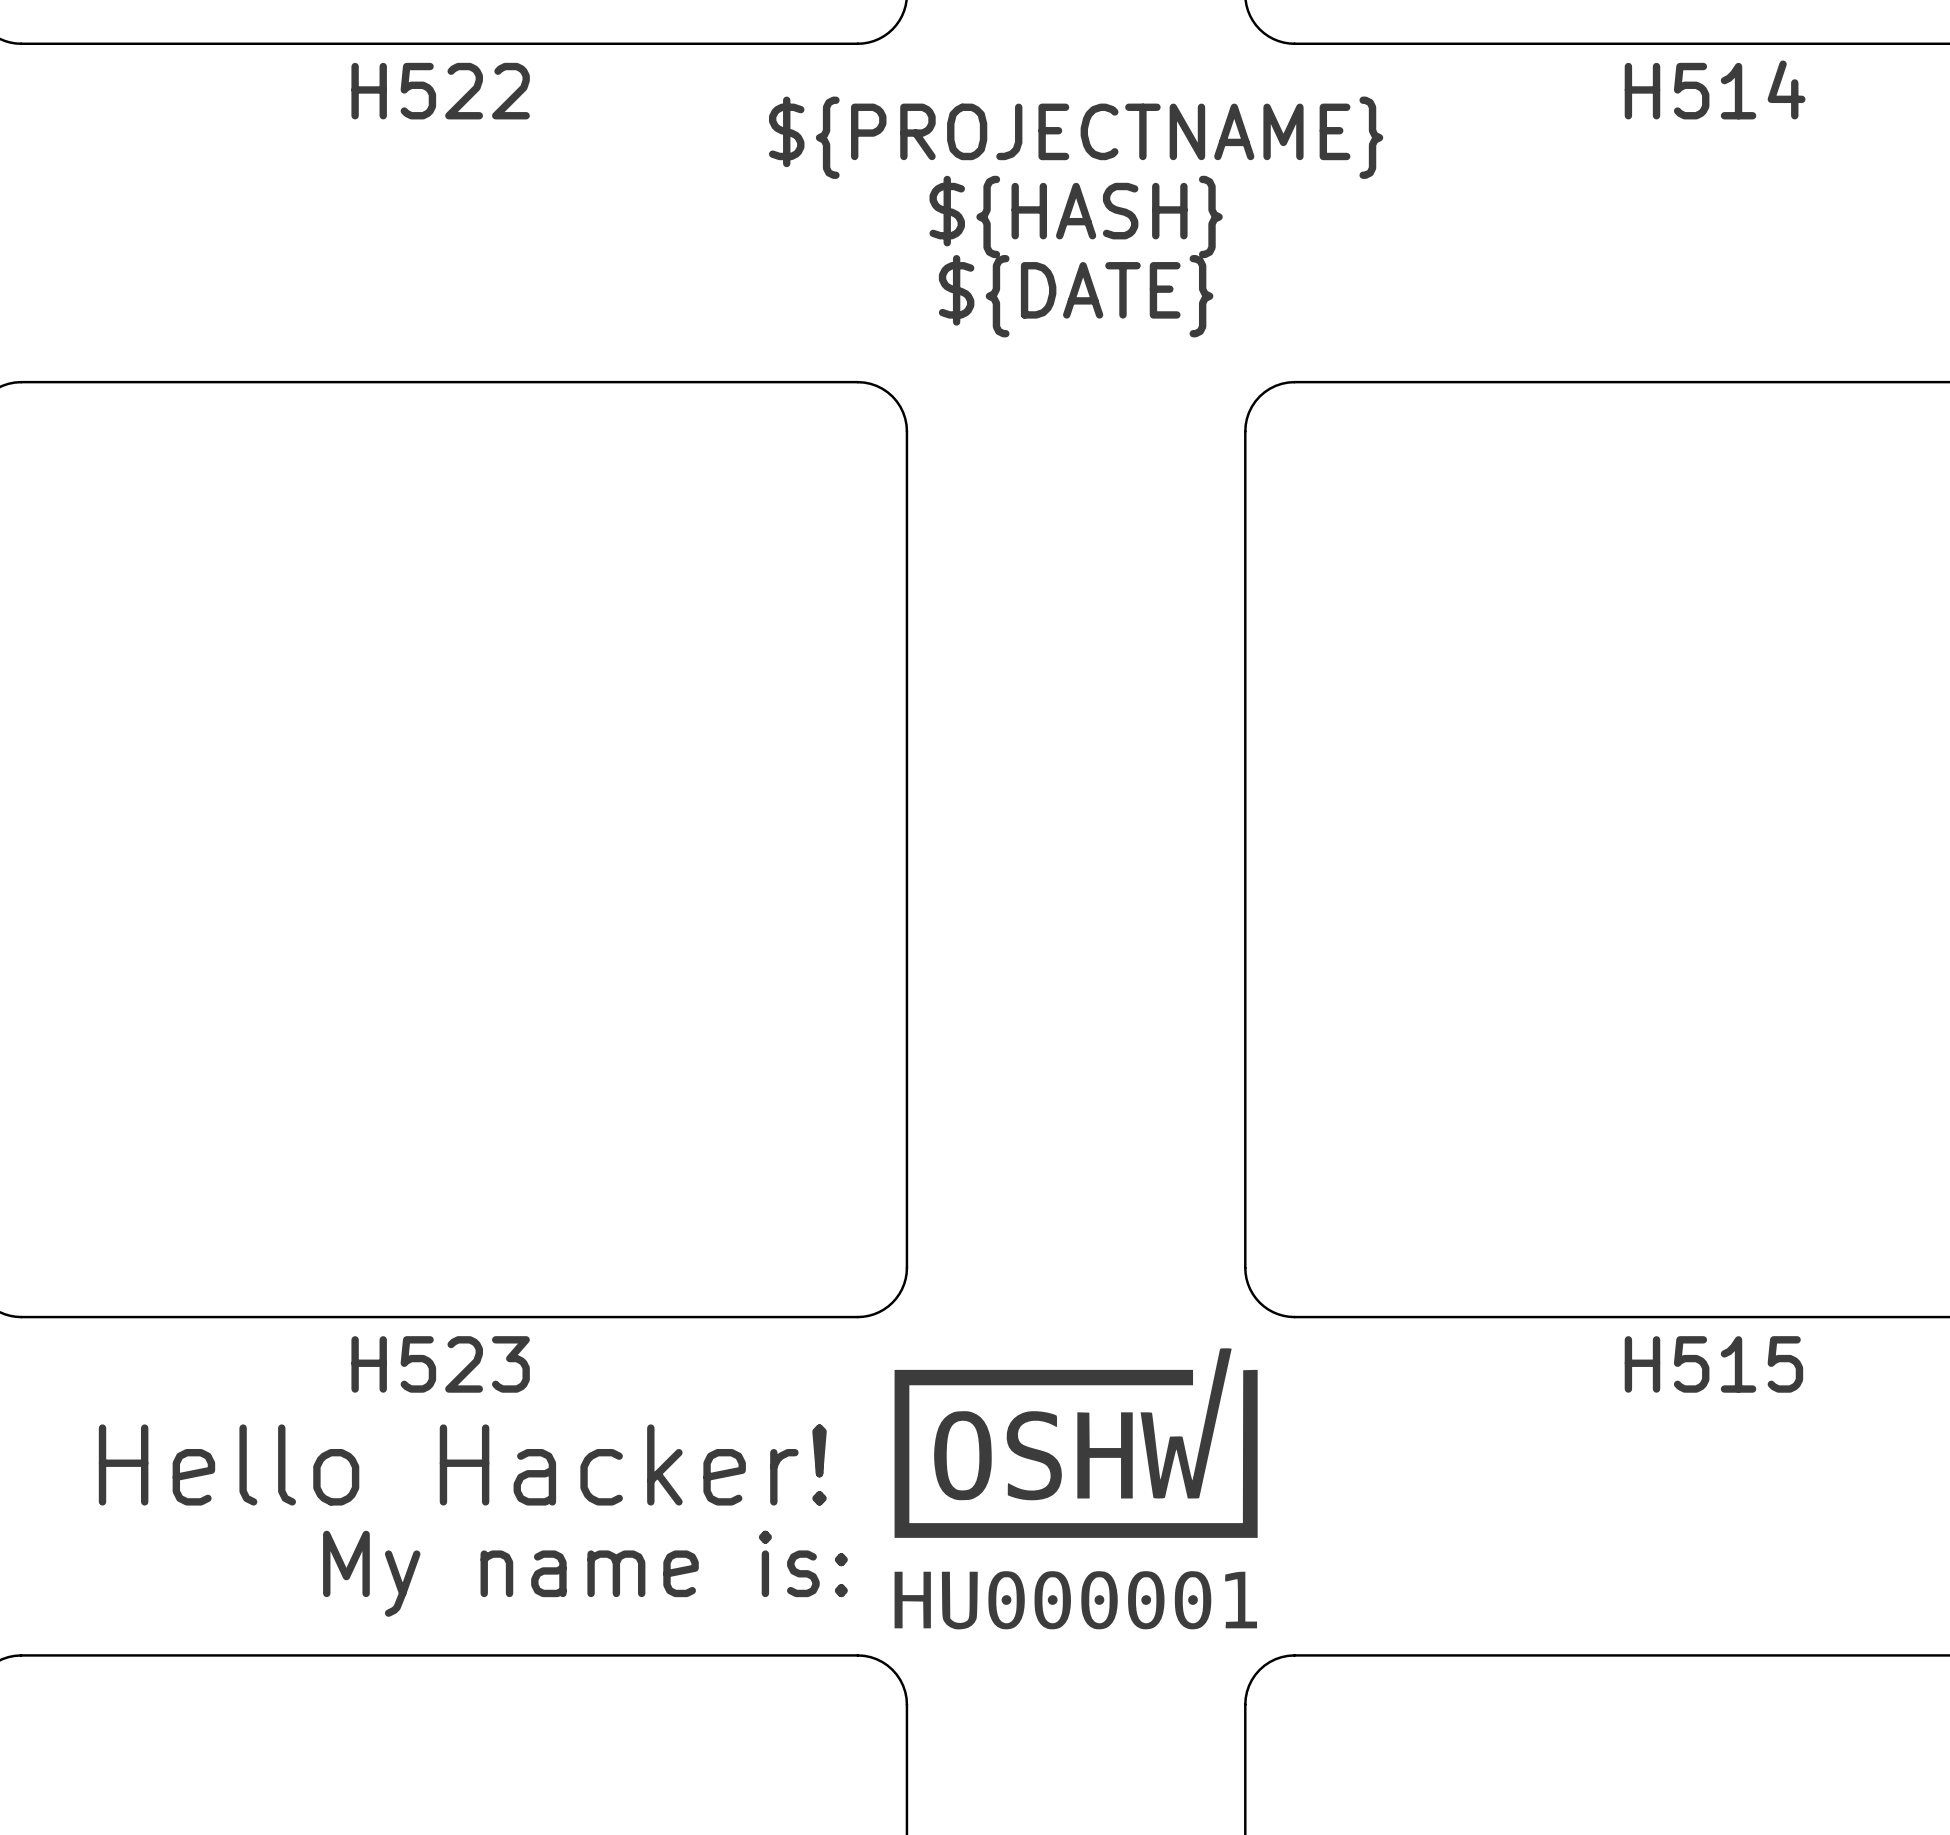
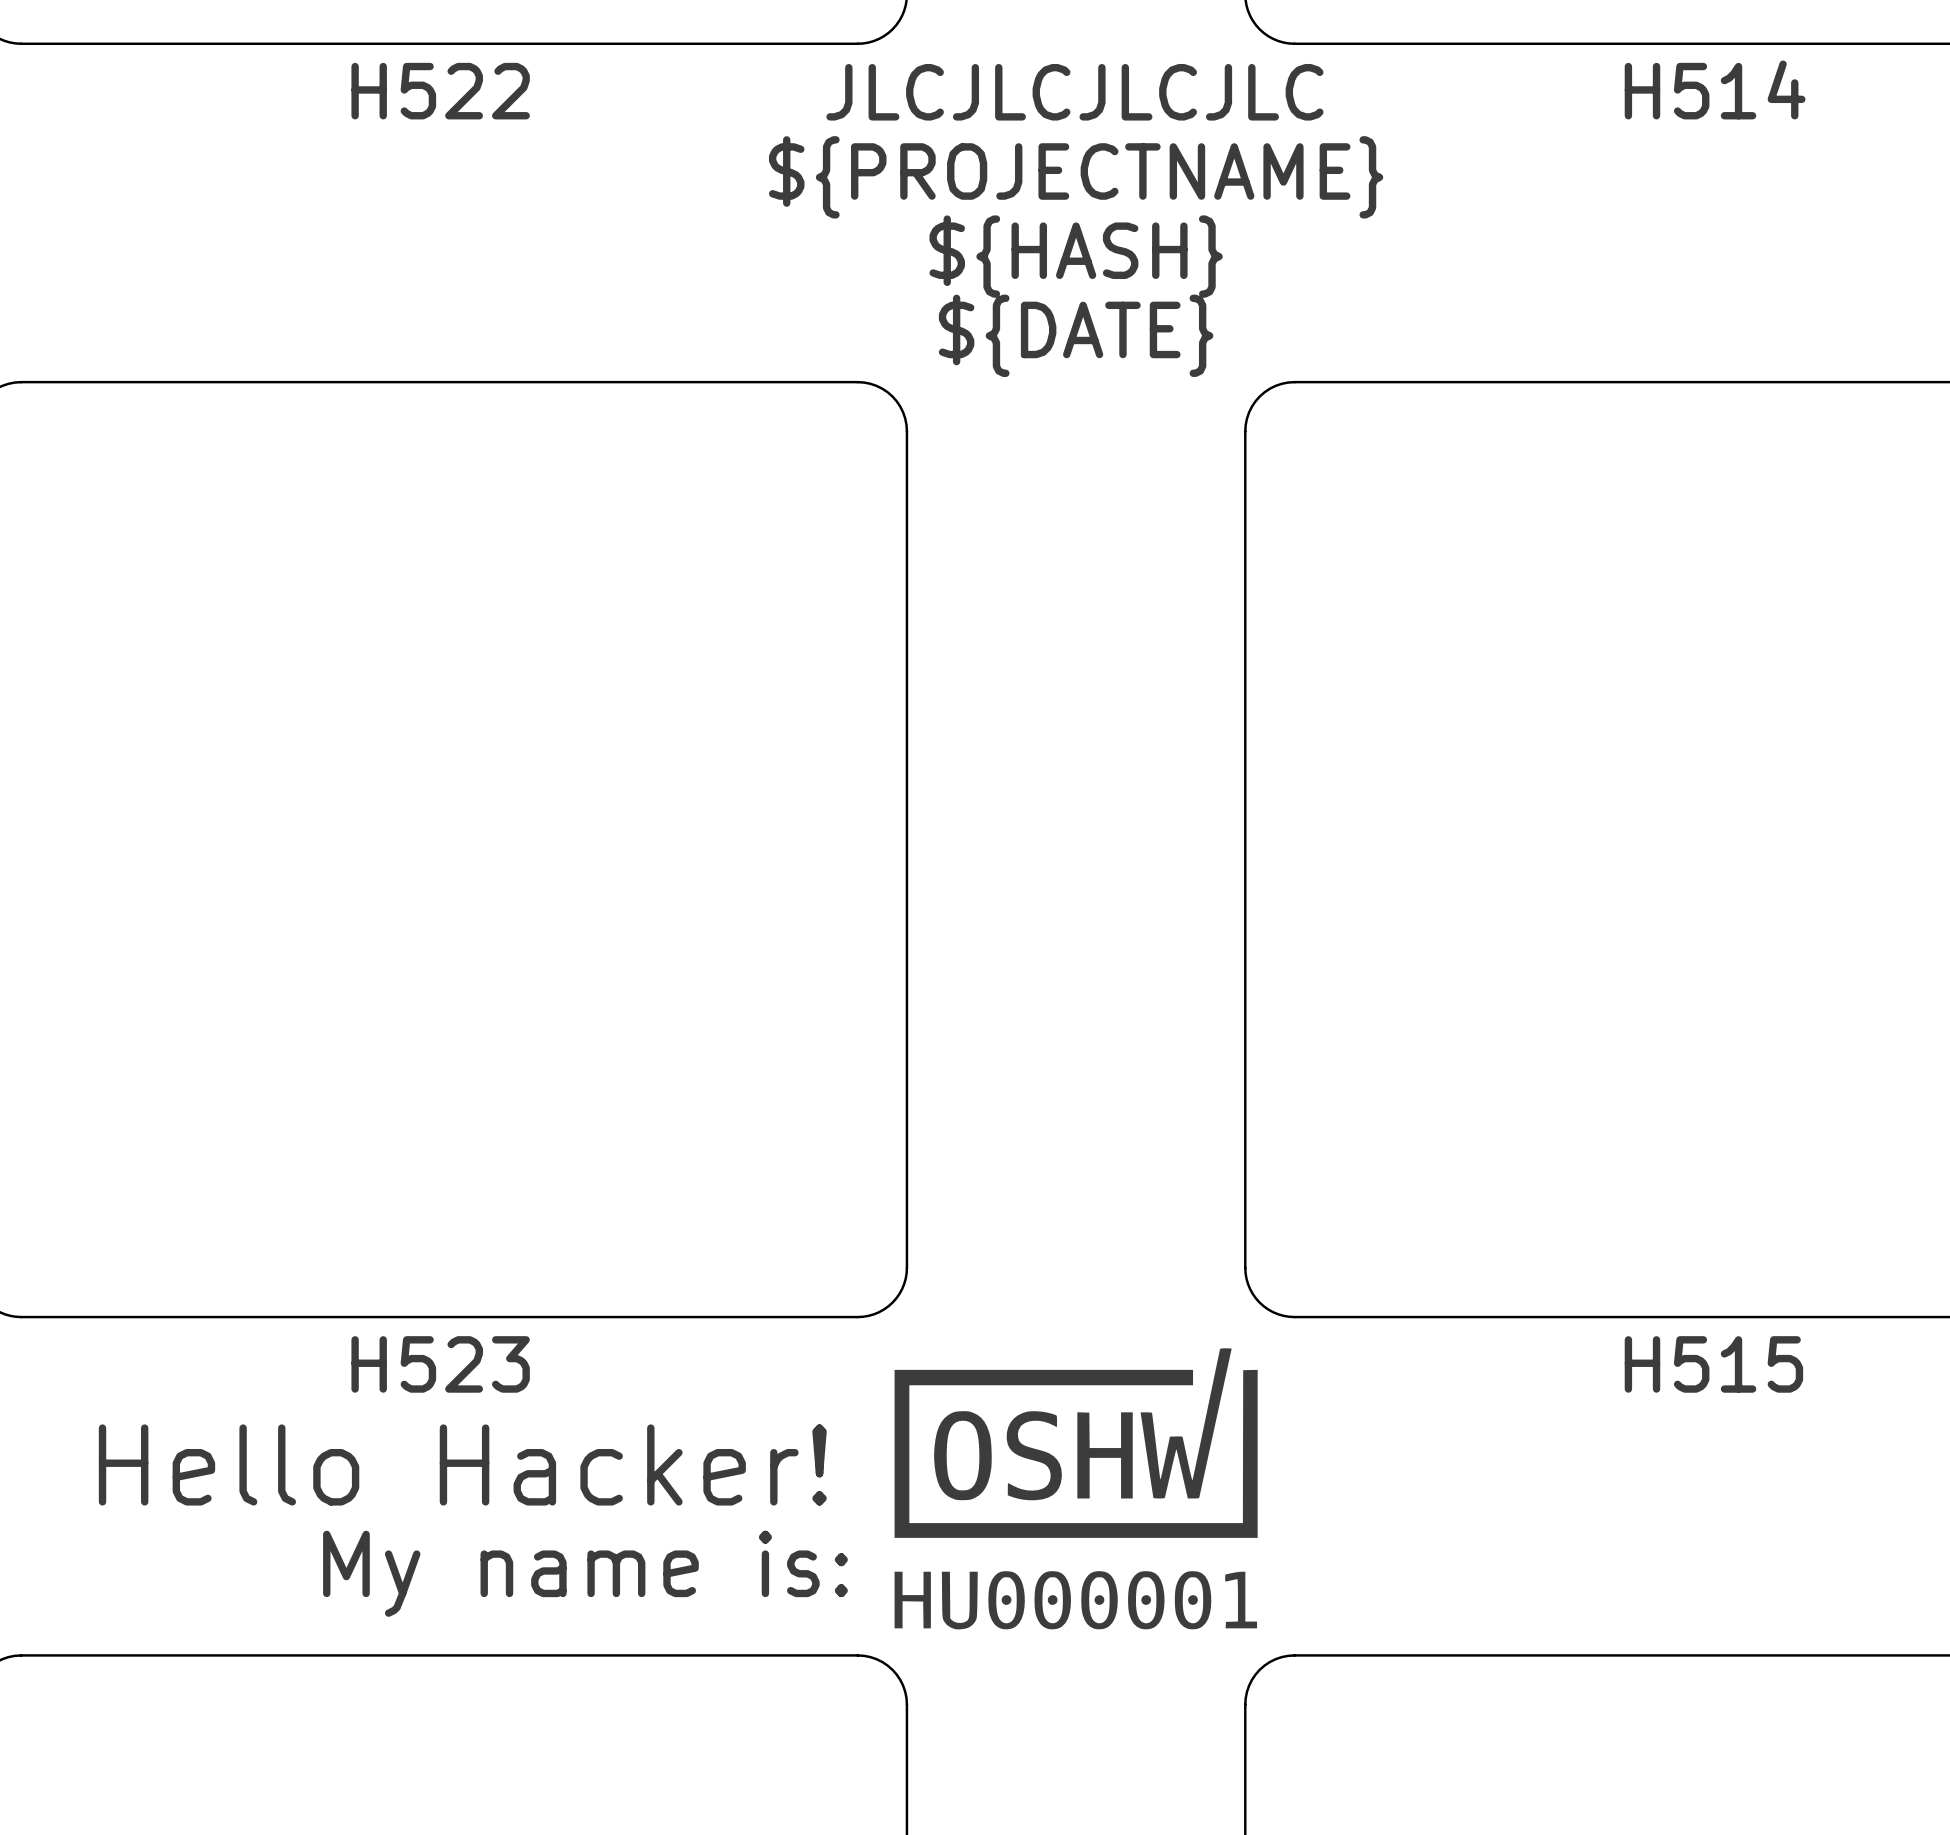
text: none -> JLCJLCJLCJLC (1074, 92)
text position: ${PROJECTNAME} (1076, 137) -> ${PROJECTNAME} (1076, 177)
text position: ${HASH} (1076, 216) -> ${HASH} (1076, 256)
text position: ${DATE} (1076, 296) -> ${DATE} (1076, 335)

